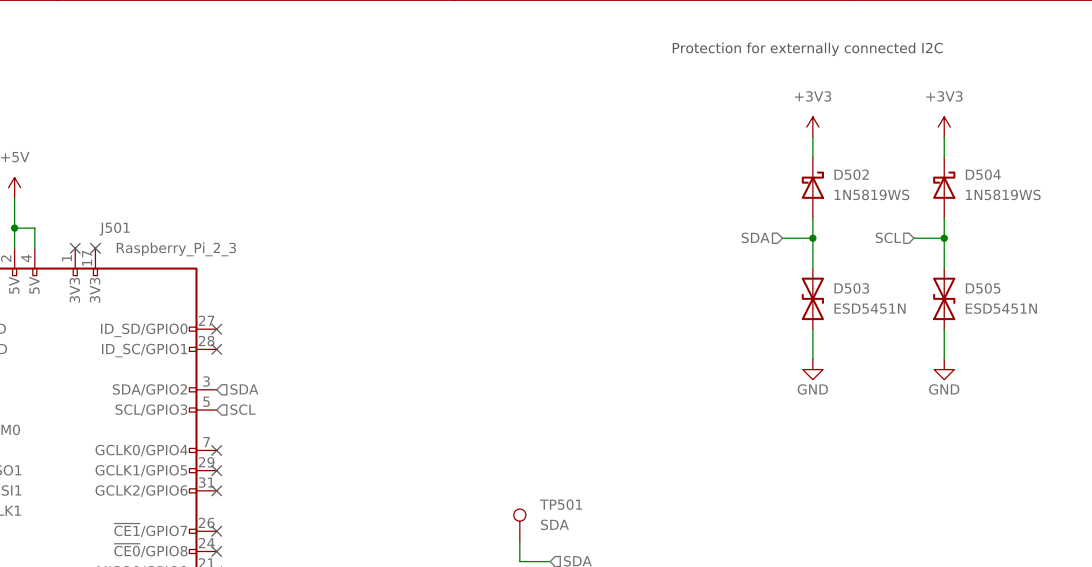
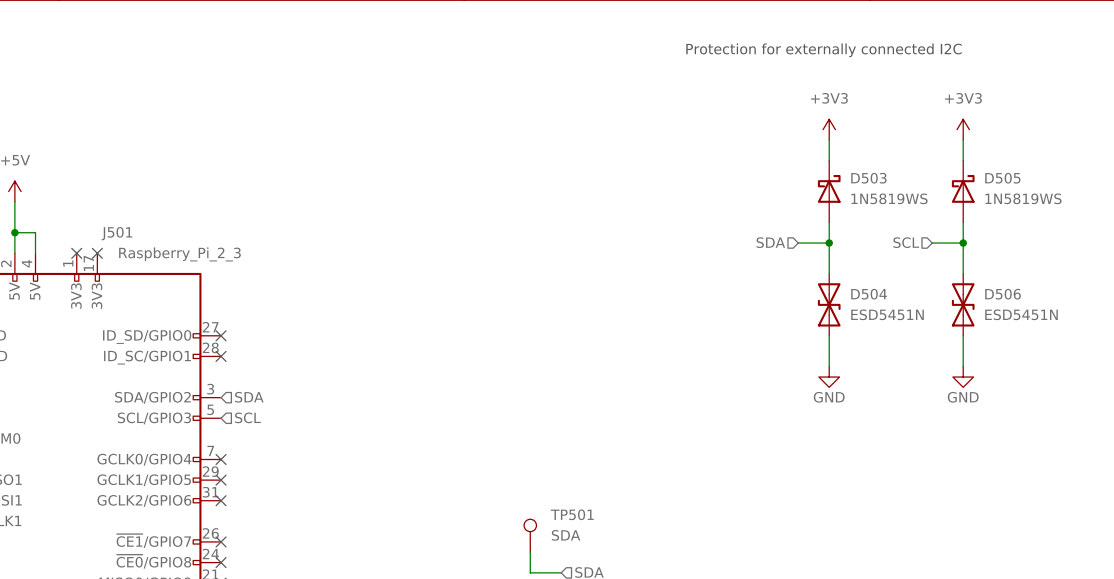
D502 name: D502 (851, 174) -> D503 (868, 178)
D504 name: D504 (983, 174) -> D505 (1002, 178)
D503 name: D503 (851, 288) -> D504 (869, 294)
D505 name: D505 (983, 288) -> D506 (1003, 294)

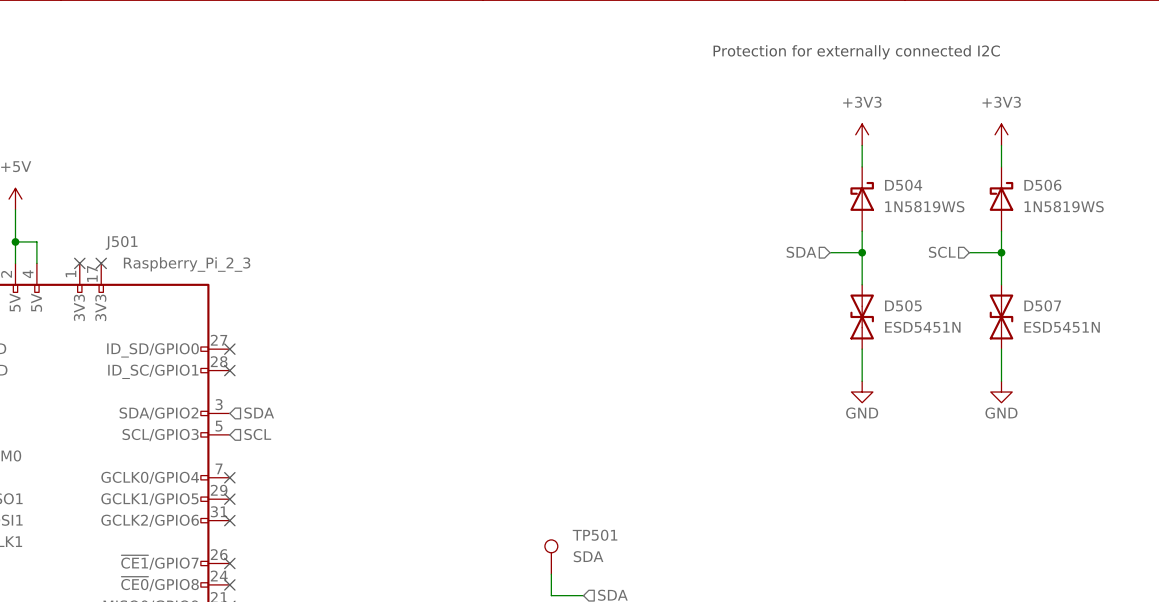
D503 name: D503 (868, 178) -> D504 (903, 185)
D505 name: D505 (1002, 178) -> D506 (1042, 185)
D504 name: D504 (869, 294) -> D505 (903, 305)
D506 name: D506 (1003, 294) -> D507 (1042, 305)

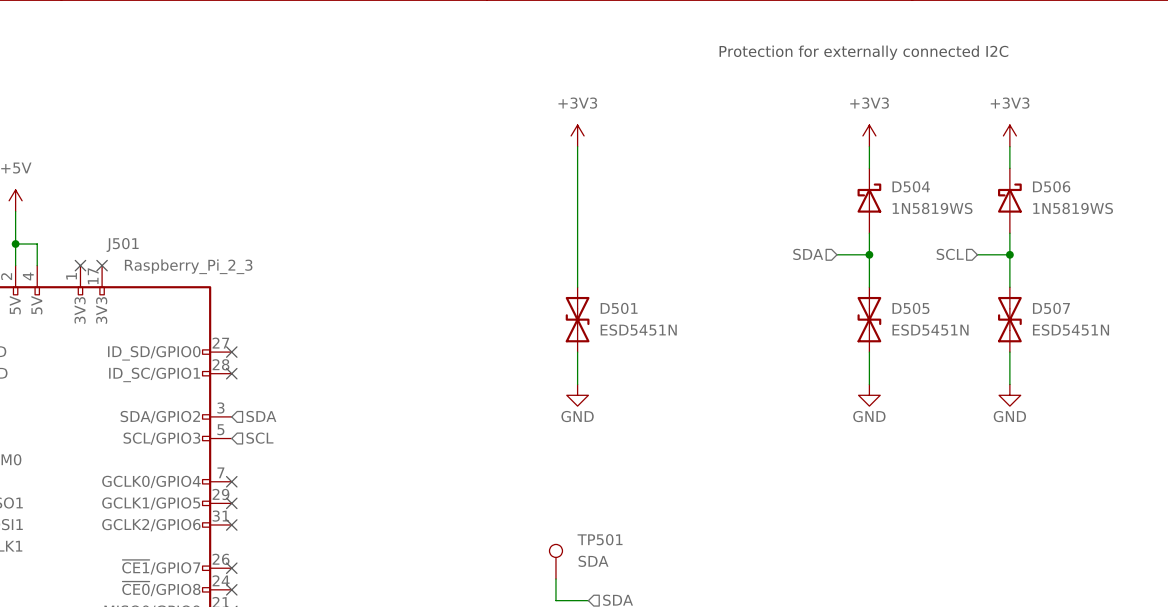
power symbol: none -> +3V3 (577, 135)
wire: none -> (577, 146) (577, 287)
D501: none -> ESD5451N (577, 319)
wire: none -> (577, 352) (577, 384)
power symbol: none -> GND (577, 395)

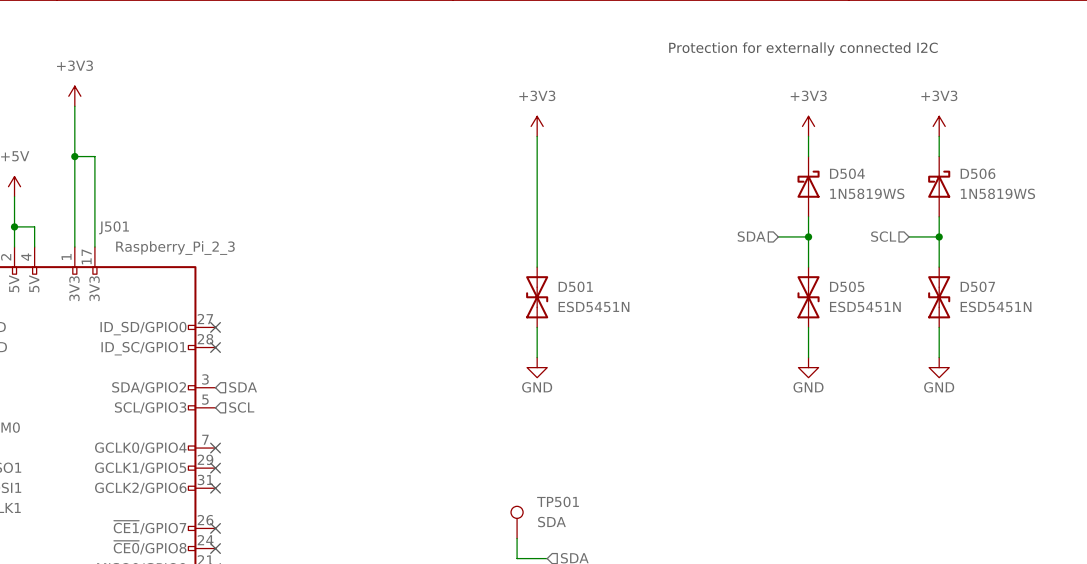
power symbol: none -> +3V3 (74, 96)
wire: none -> (74, 106) (74, 247)
wire: none -> (74, 156) (94, 156) (94, 247)
junction: none -> (74, 156)
no-connect mark: (80, 265) -> none
no-connect mark: (102, 265) -> none

